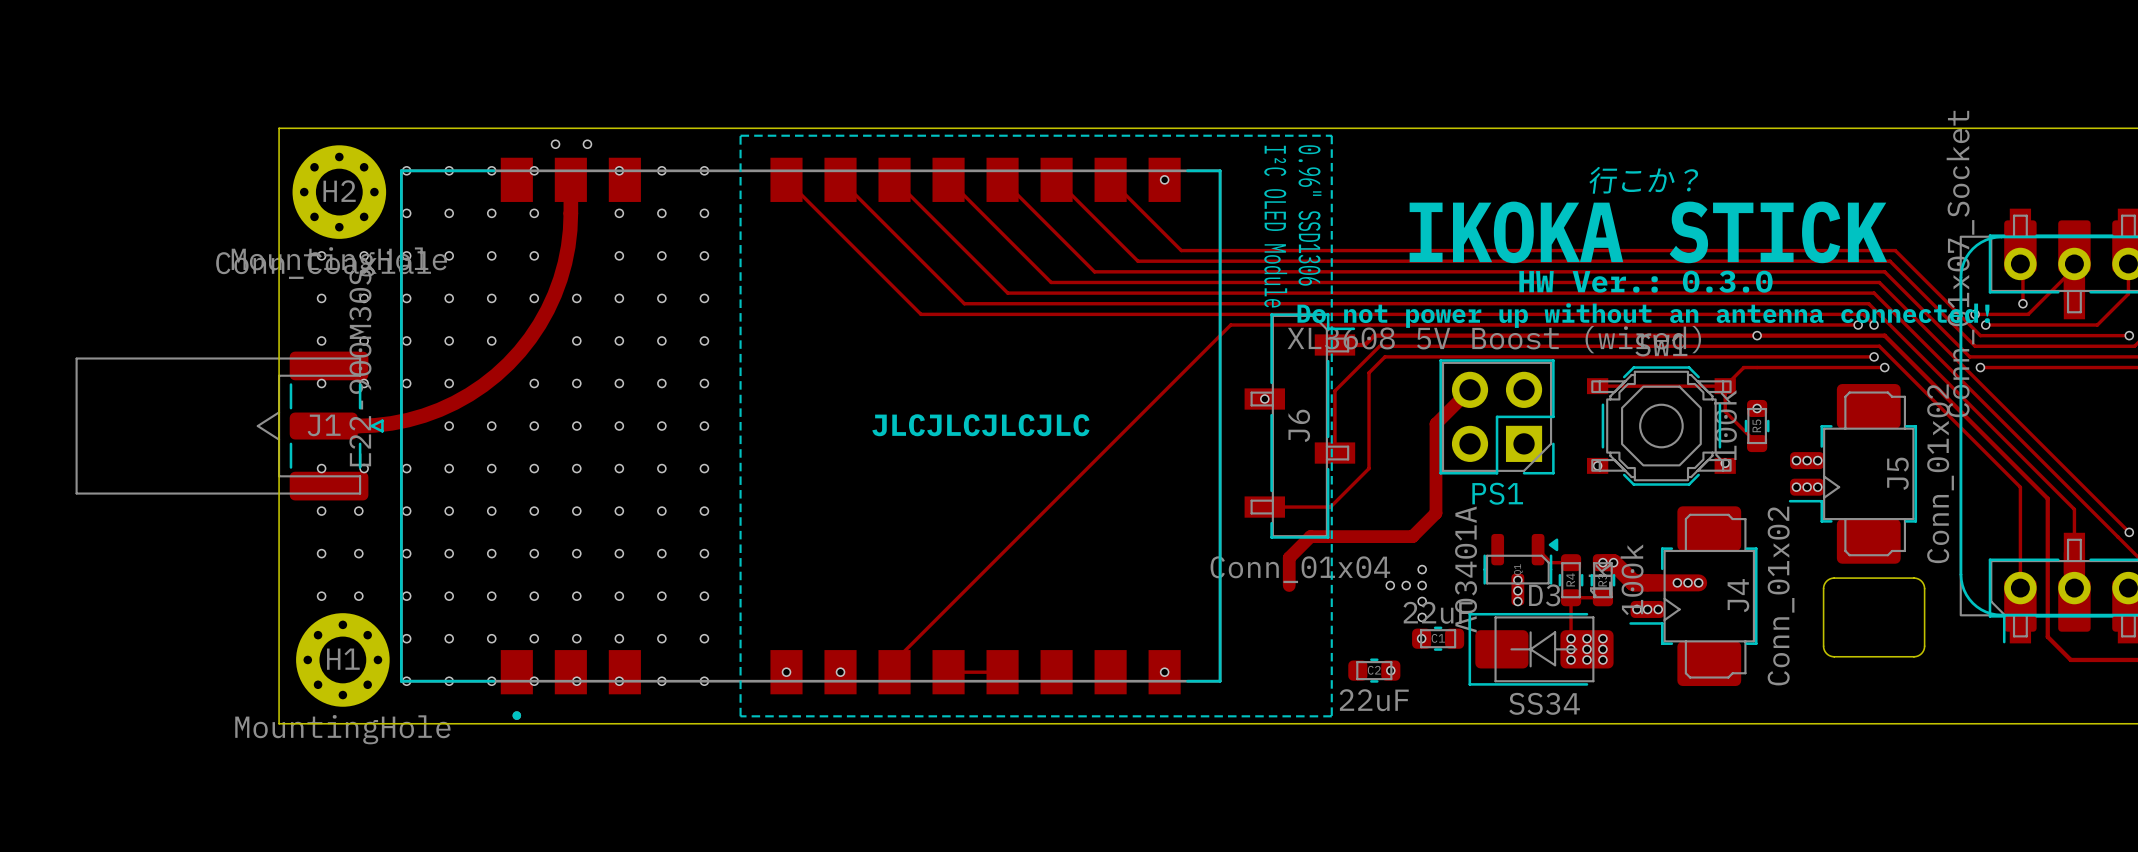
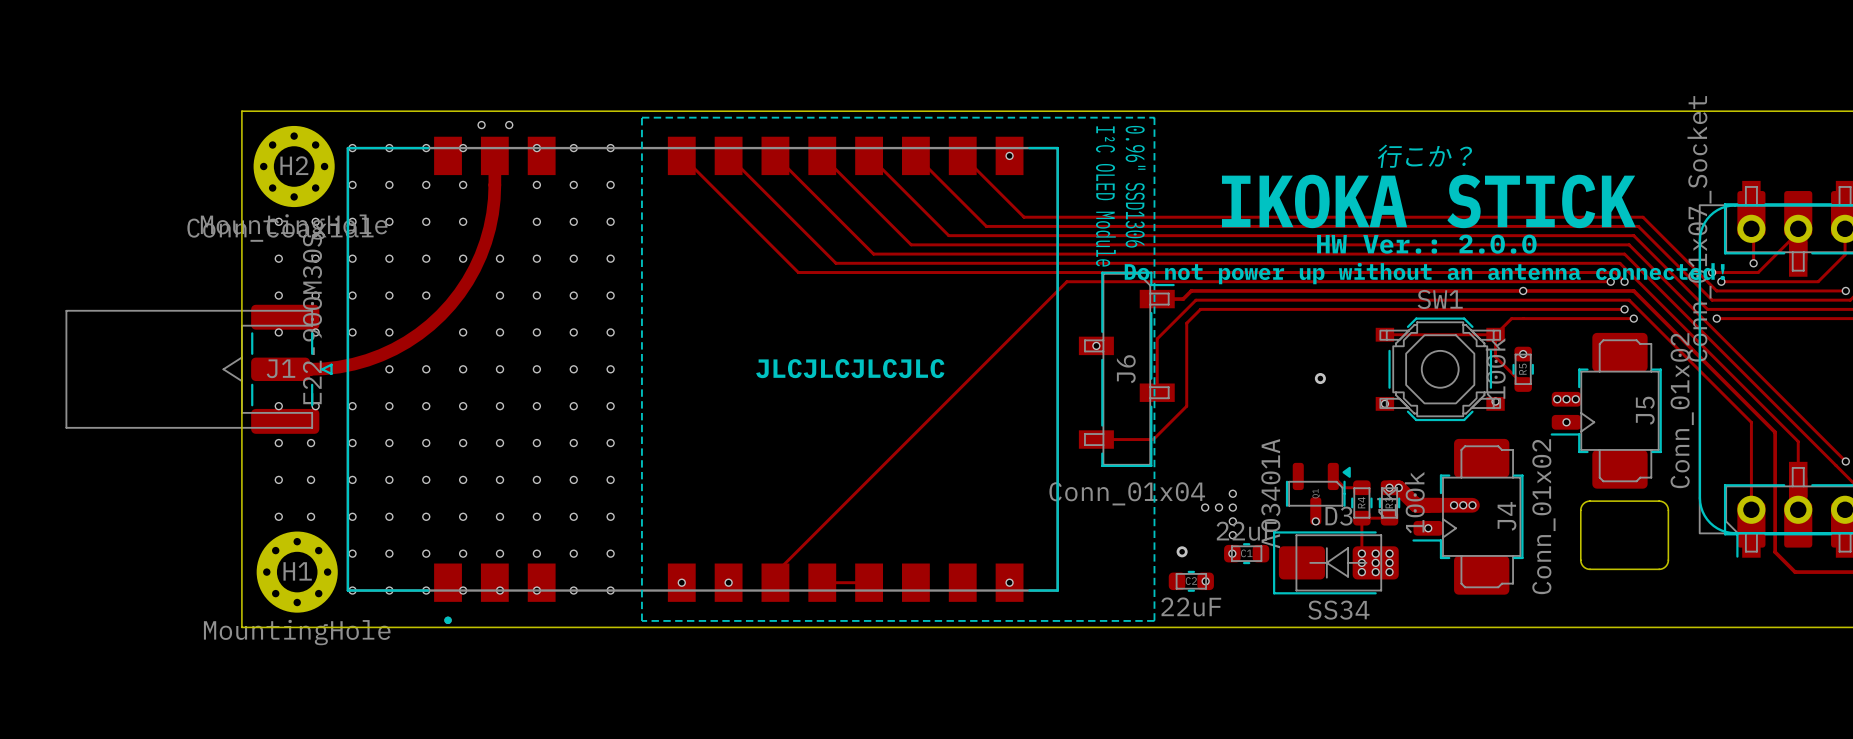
text: HW Ver.: 0.3.0 (1645, 281) -> HW Ver.: 2.0.0 (1426, 244)
track: (1470, 389) (1435, 423) (1435, 513) (1412, 536) (1310, 536) (1289, 557) (1289, 585) -> none
PS1: XL3608 5V Boost (wired) (1497, 416) -> none
via: none -> (1320, 378)
via: (1796, 487) -> none
via: (1817, 487) -> none
via: (1517, 580) -> none
via: (1517, 590) -> none
via: (1636, 609) -> none
via: (1658, 609) -> none
via: none -> (1182, 551)

